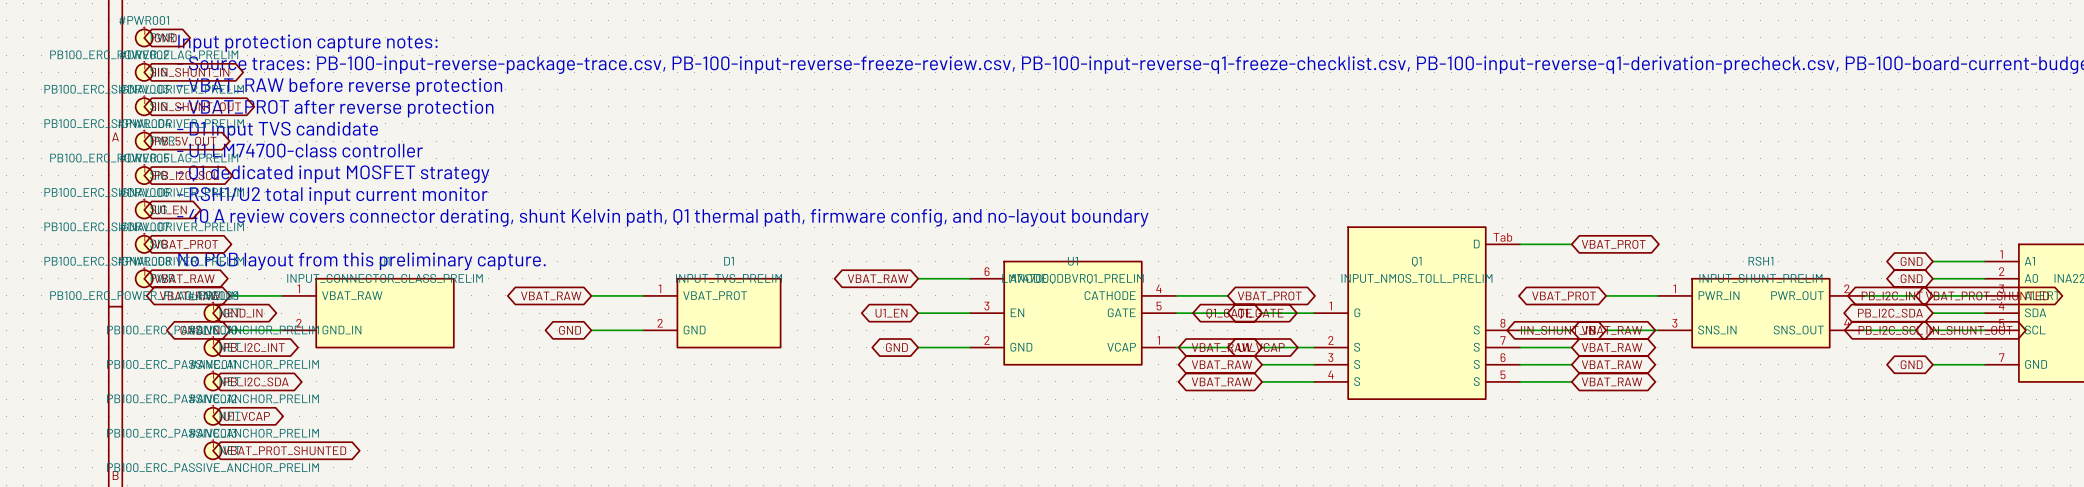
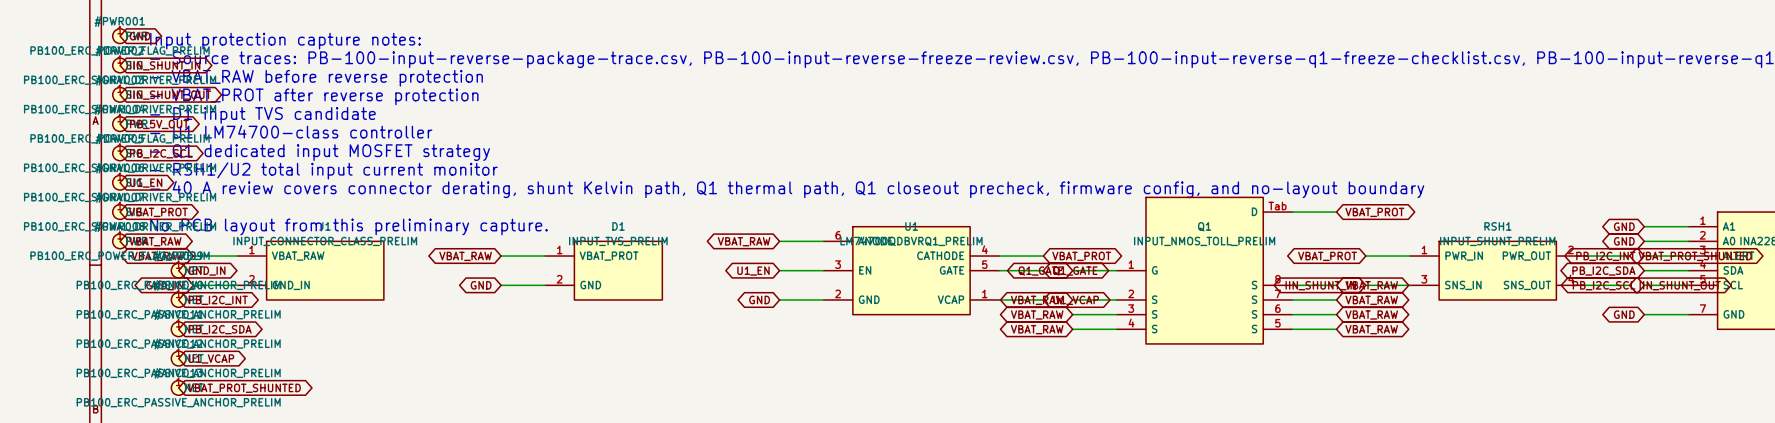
text: - 40 A review covers connector derating, shunt Kelvin path, Q1 thermal path, firmware config, and no-layout boundary (662, 217) -> - 40 A review covers connector derating, shunt Kelvin path, Q1 thermal path, Q1 closeout precheck, firmware config, and no-layout boundary (787, 189)

